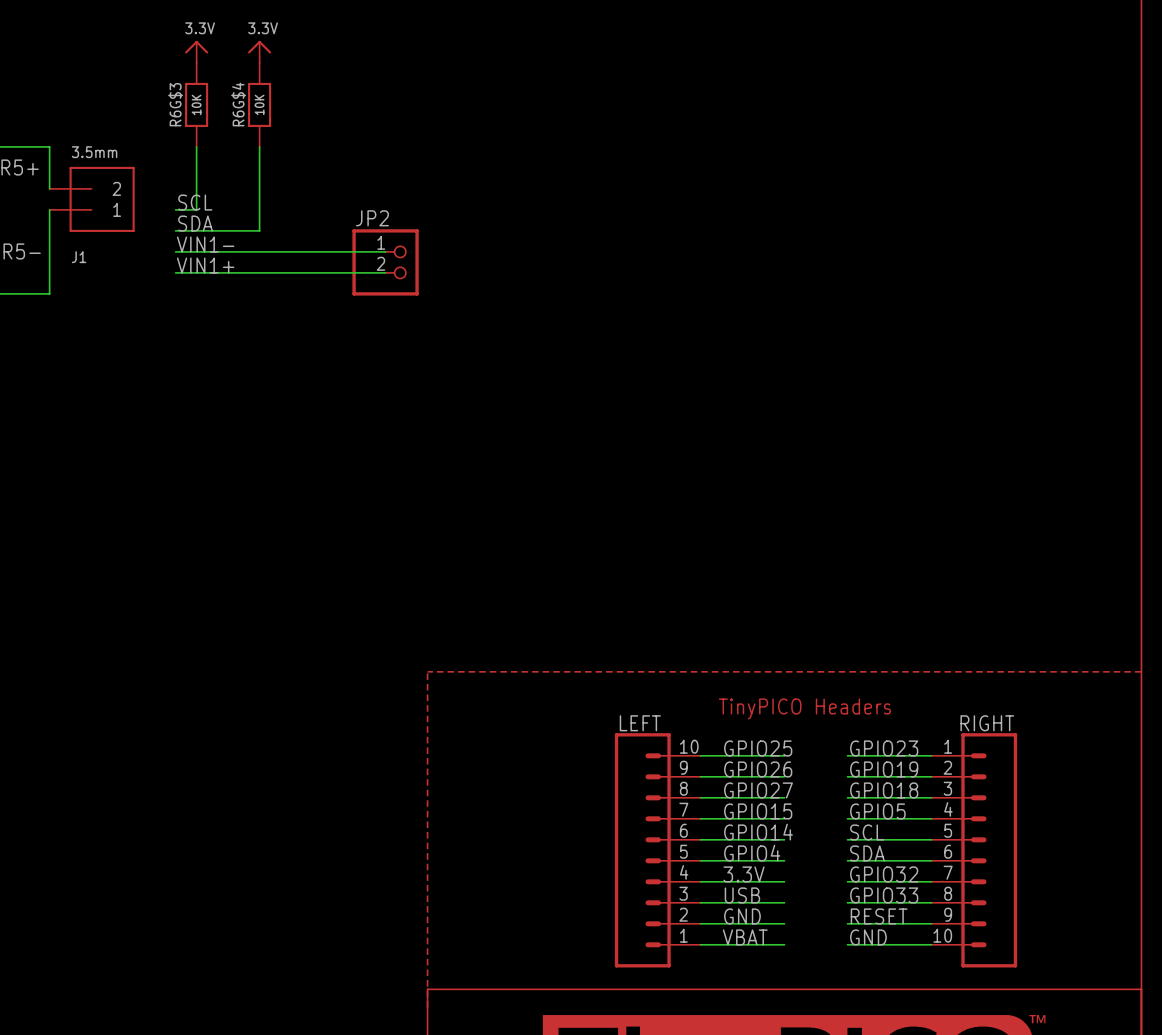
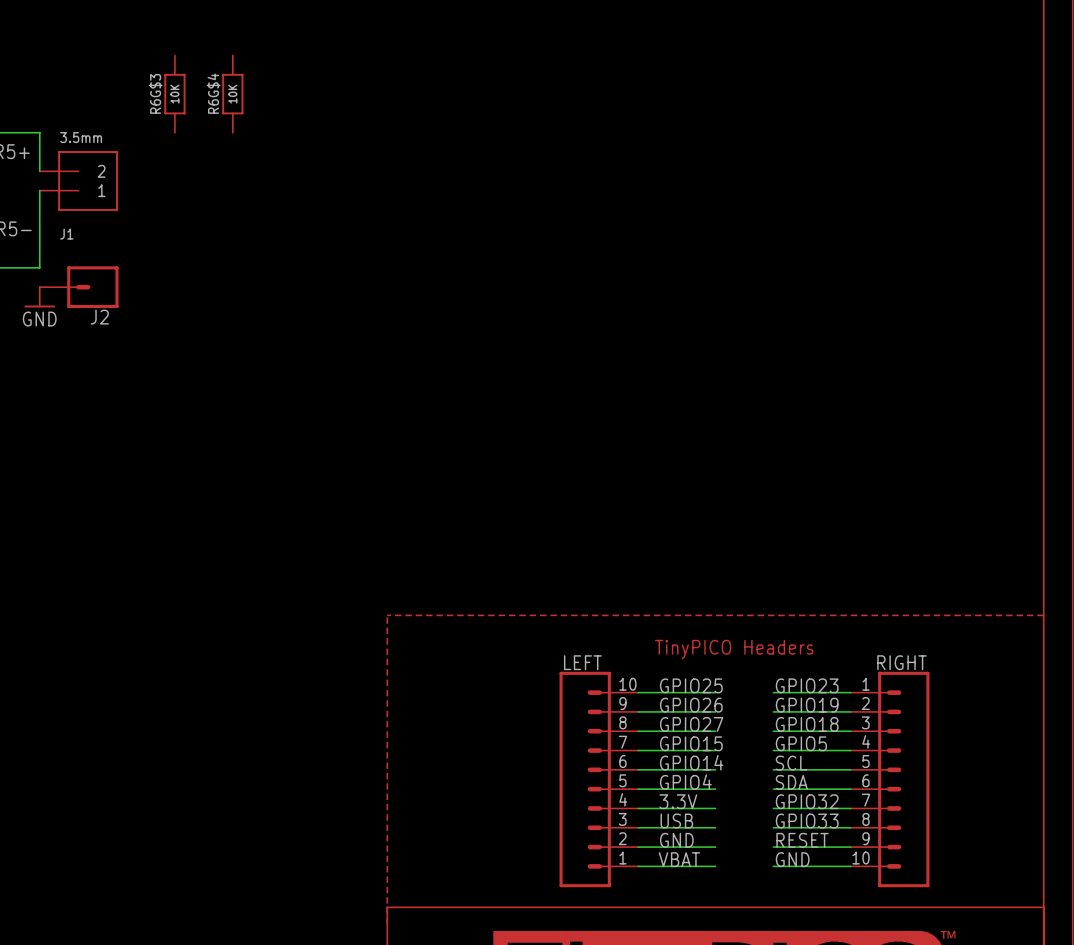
power symbol: 3.3V (196, 51) -> none
power symbol: 3.3V (259, 51) -> none
wire: (196, 146) (196, 209) (175, 209) -> none
wire: (259, 146) (259, 230) (175, 230) -> none
label: SCL (195, 202) -> none
label: SDA (195, 223) -> none
label: VIN1- (205, 244) -> none
wire: (175, 251) (385, 251) -> none
JP2: (385, 262) -> none
label: VIN1+ (205, 265) -> none
wire: (175, 272) (385, 272) -> none
J2: none -> (79, 287)
power symbol: none -> GND (39, 297)

